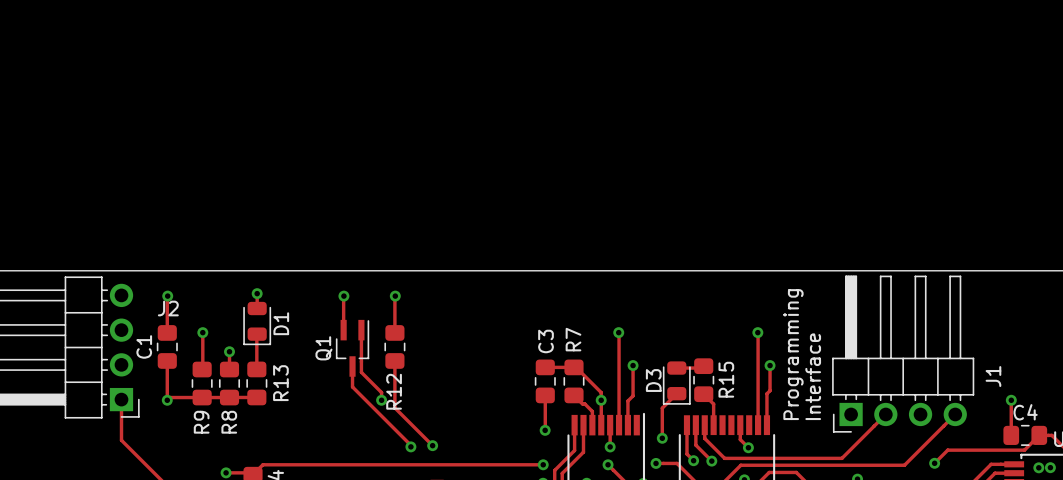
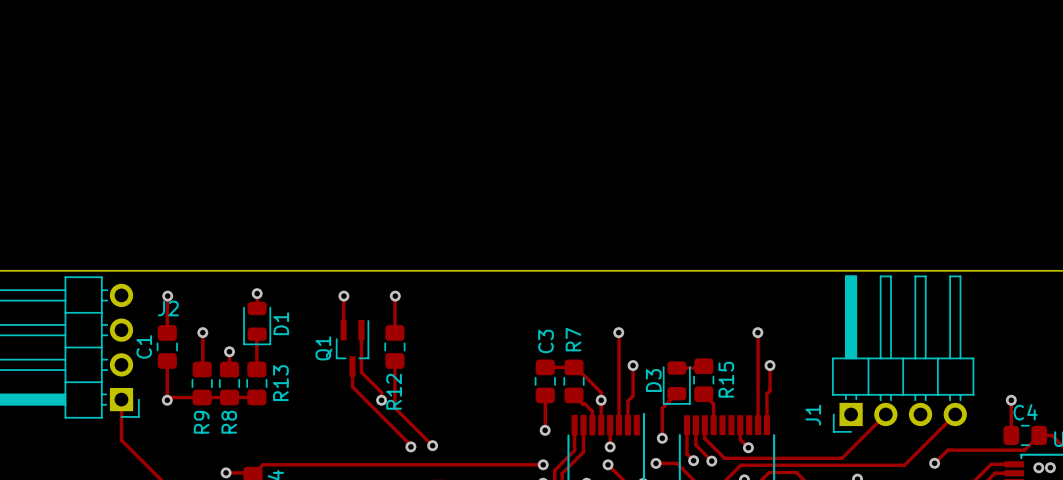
text: Programming (793, 354) -> none
text: Interface (813, 376) -> none
J1 name position: J1 (993, 376) -> J1 (813, 415)

